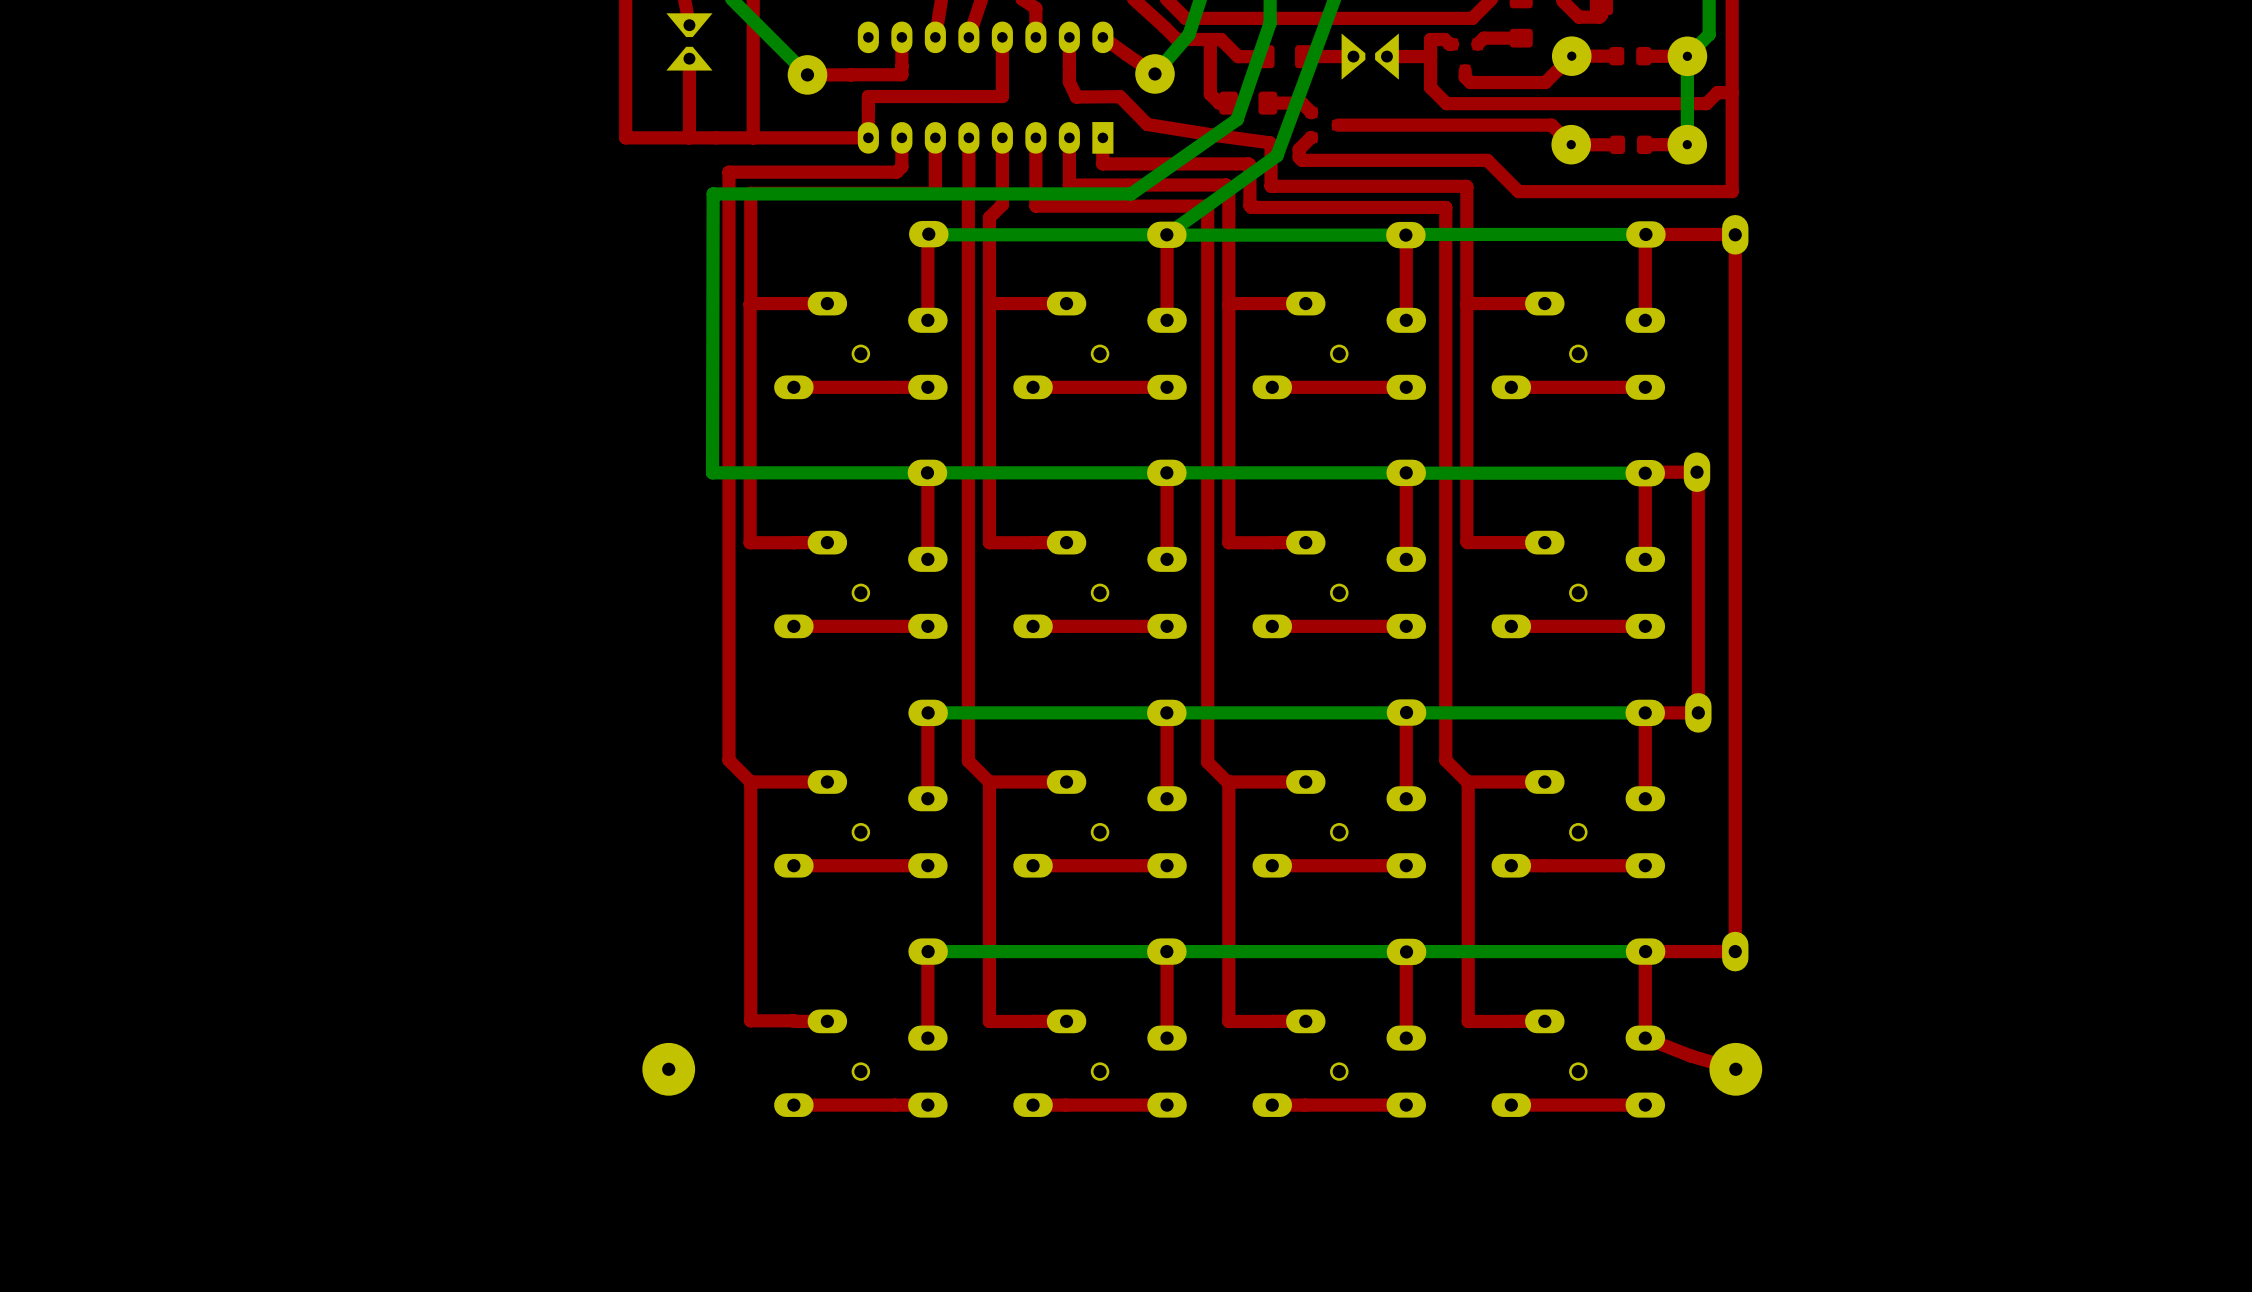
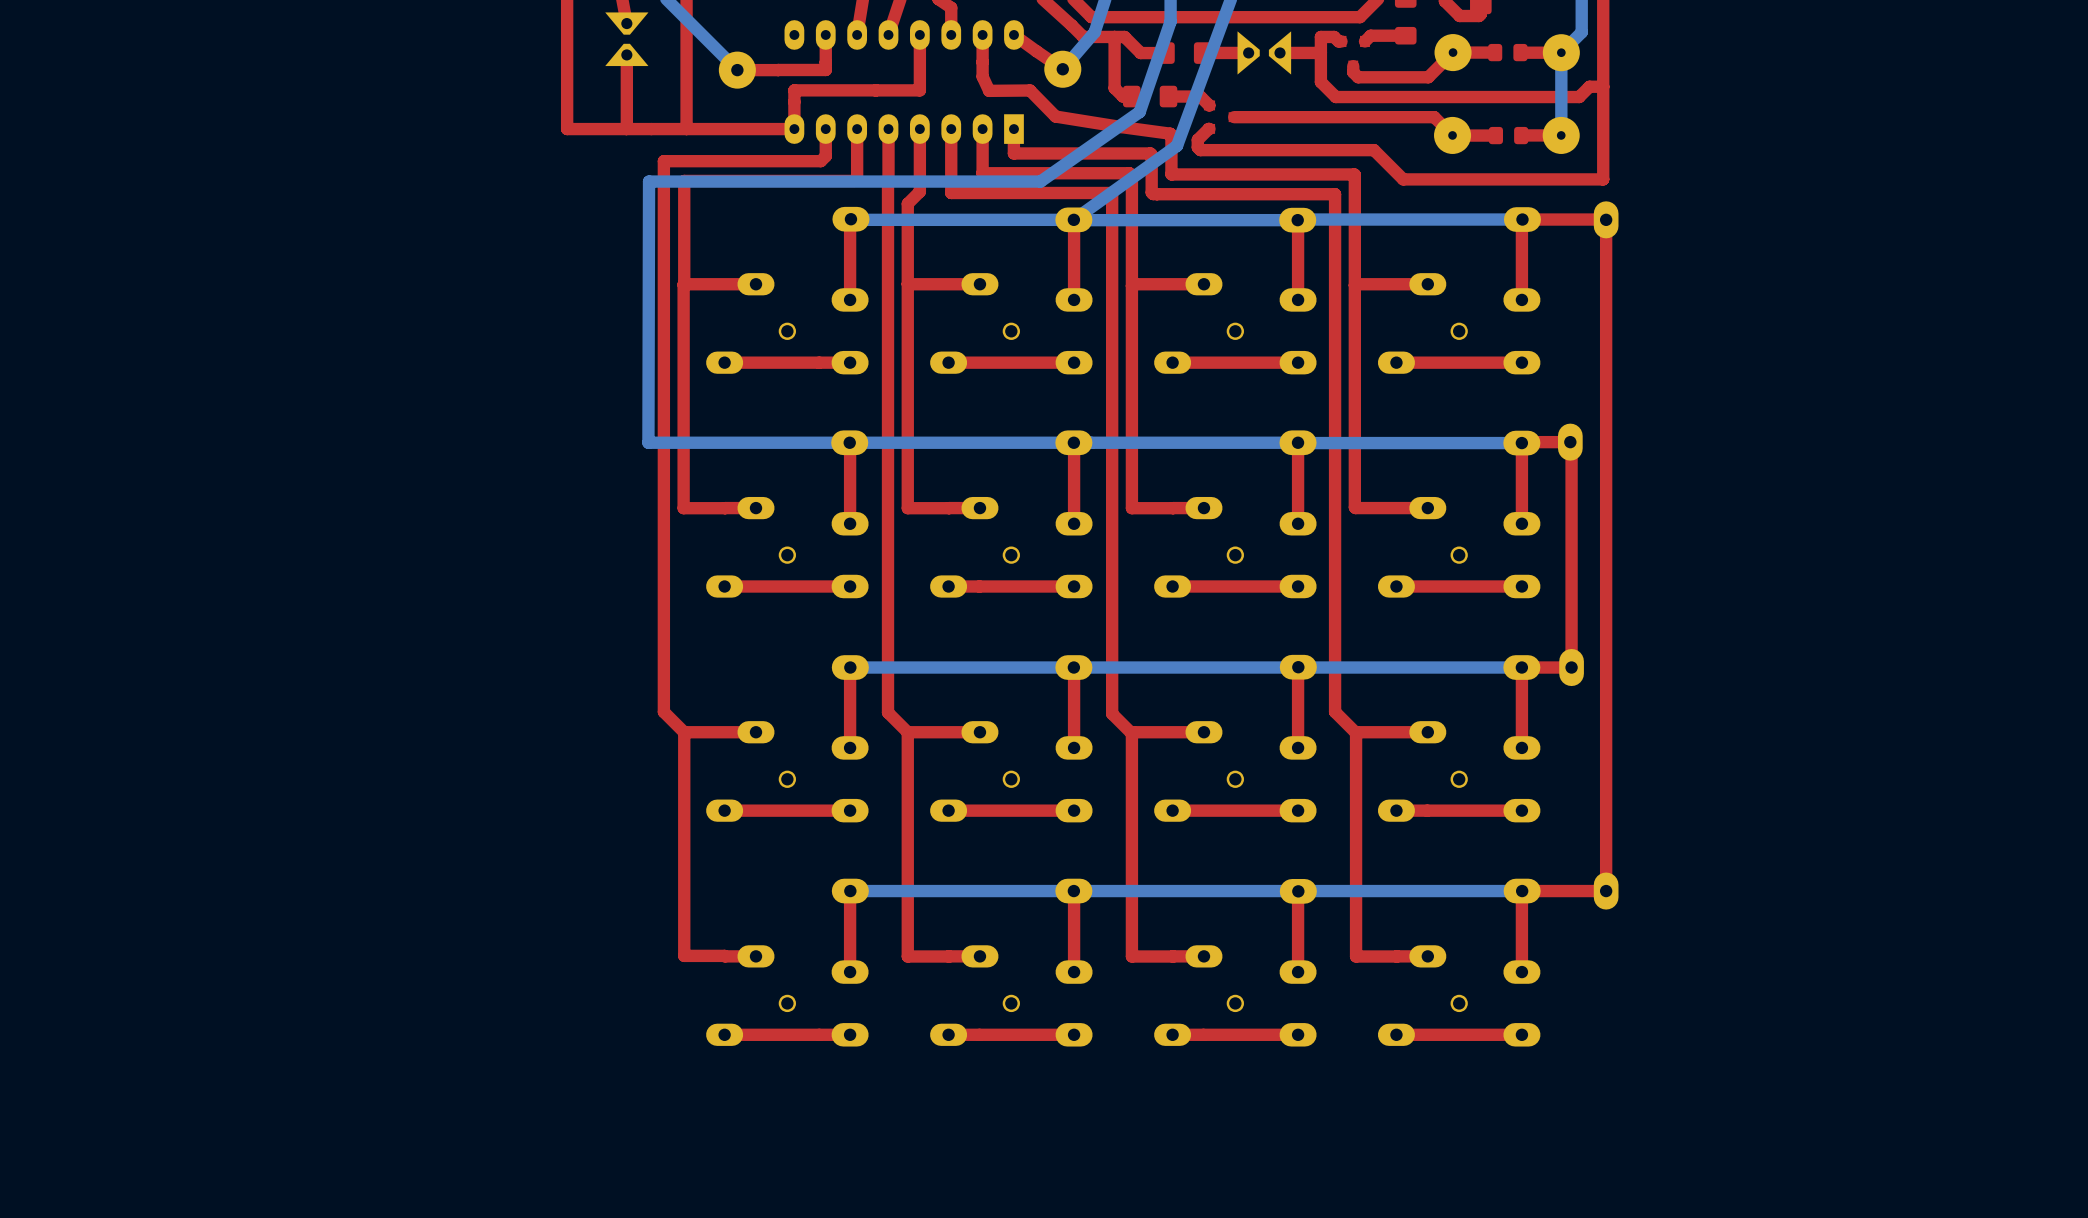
top track: (1645, 1038) (1690, 1055) (1735, 1069) -> none
part: (668, 1069) -> none
part: (1735, 1069) -> none

